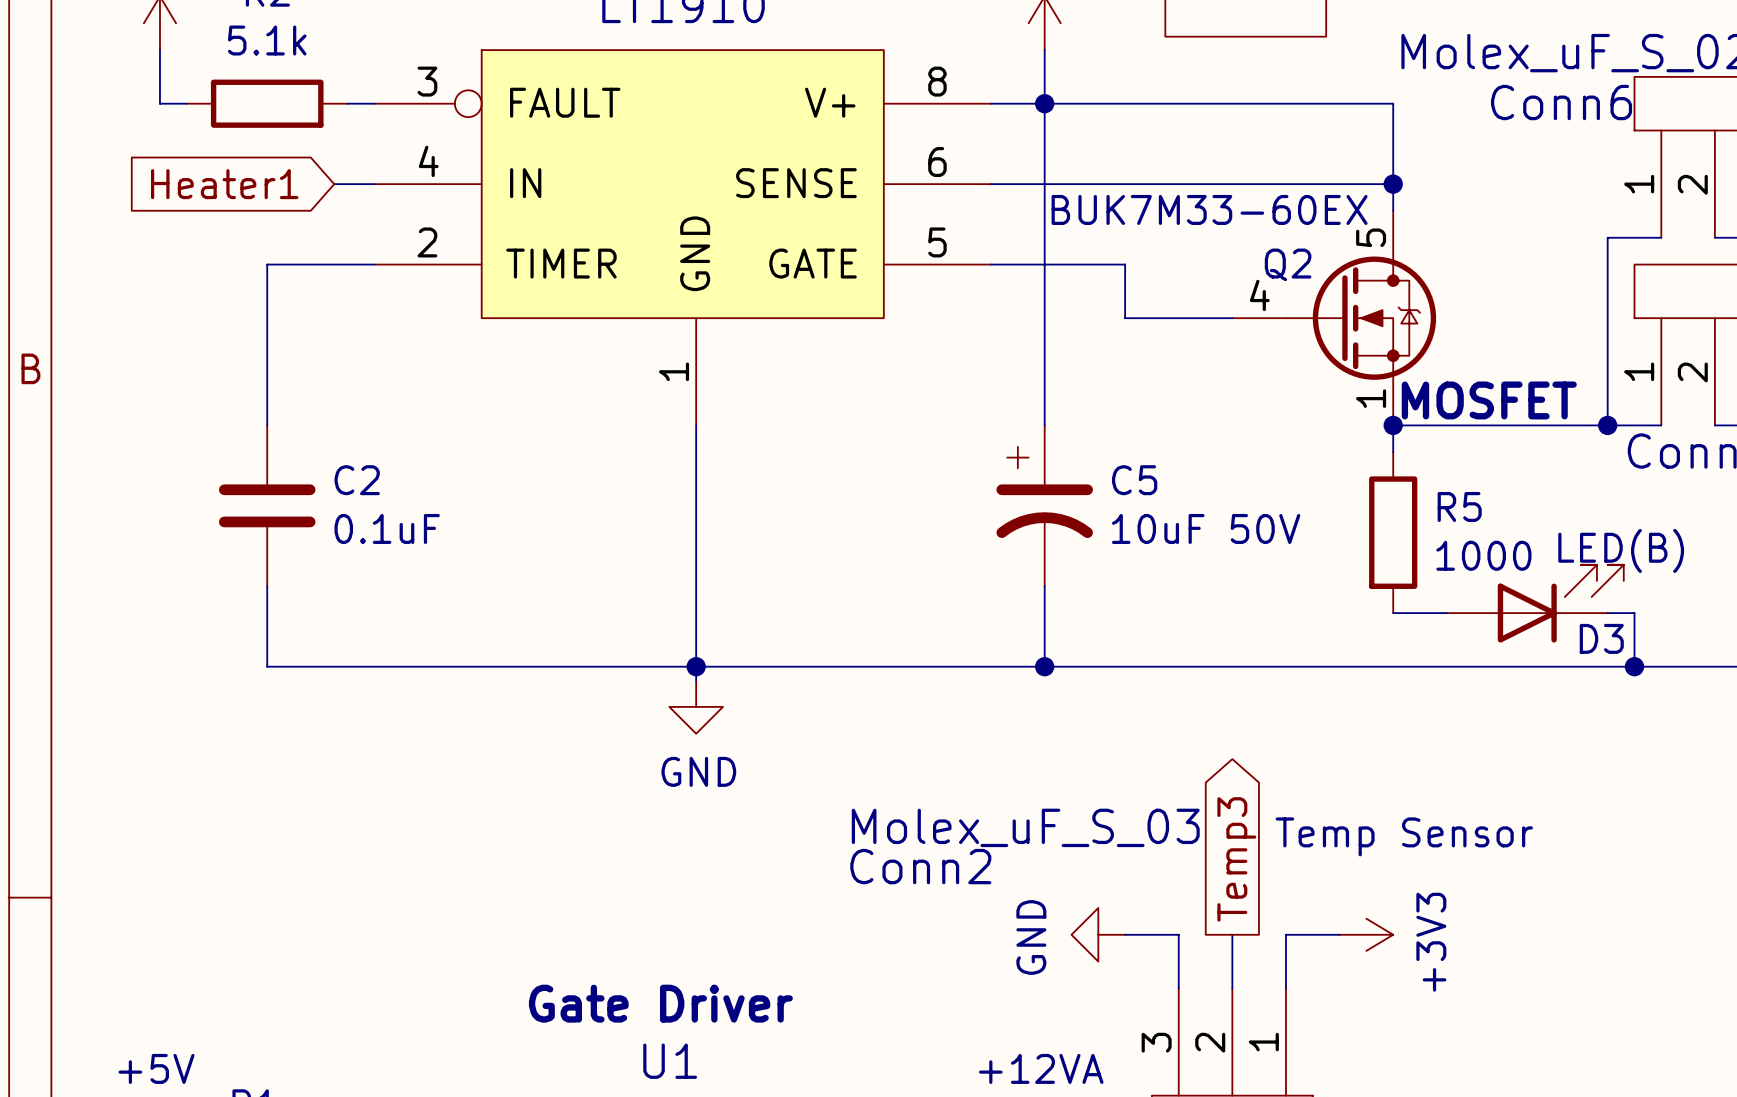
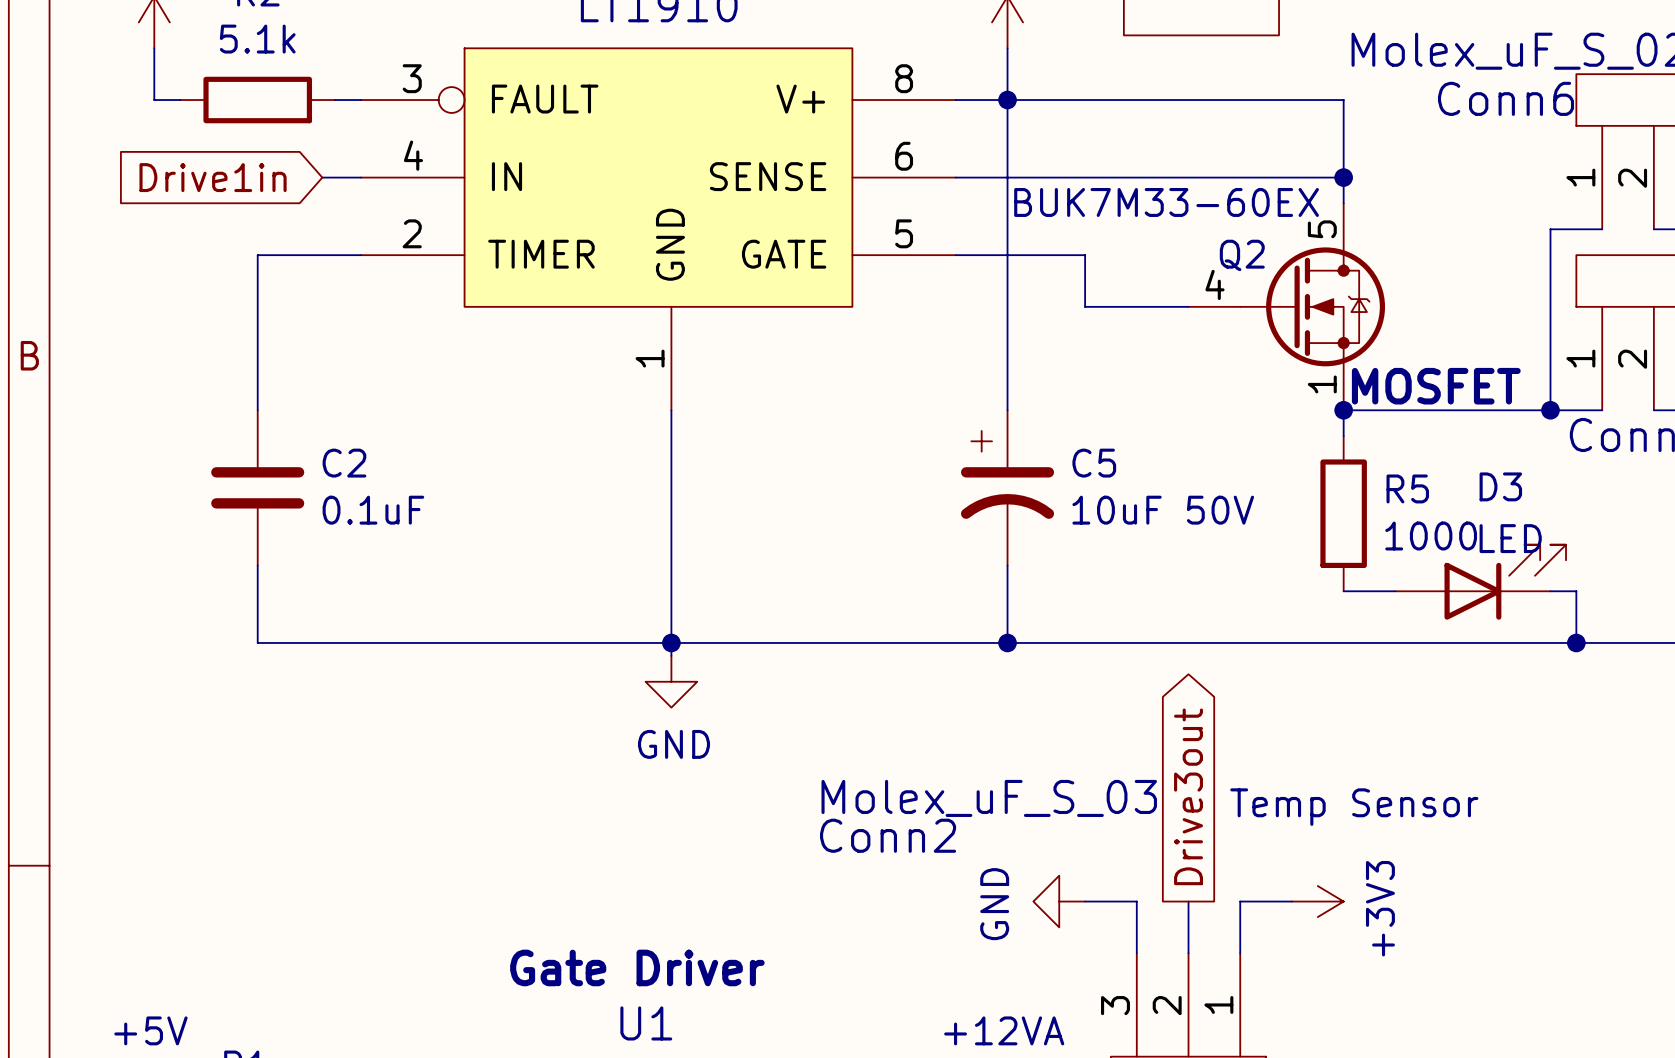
global label: Heater1 (224, 184) -> Drive1in (213, 177)
D3 value: LED(B) (1621, 550) -> LED (1510, 538)
D3 name position: D3 (1601, 638) -> D3 (1500, 486)
global label: Temp3 (1236, 859) -> Drive3out (1188, 796)

